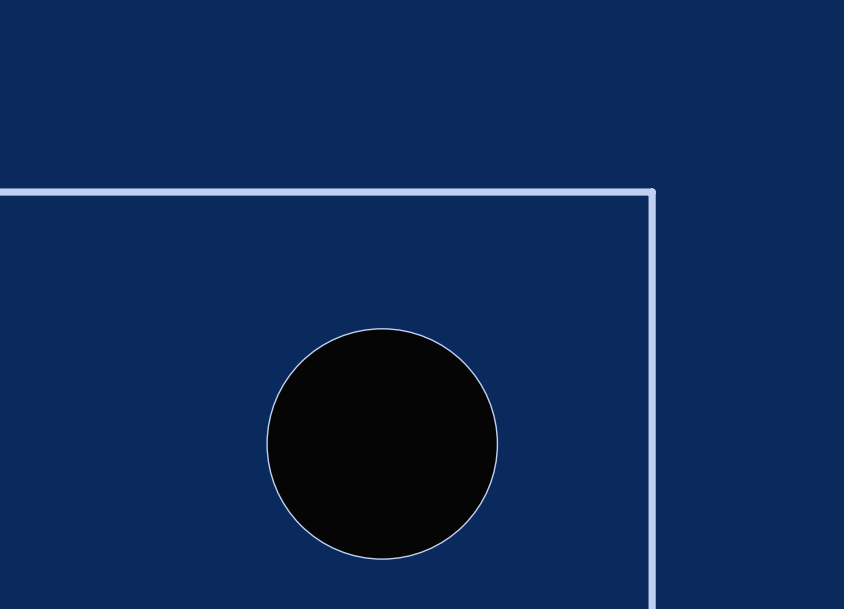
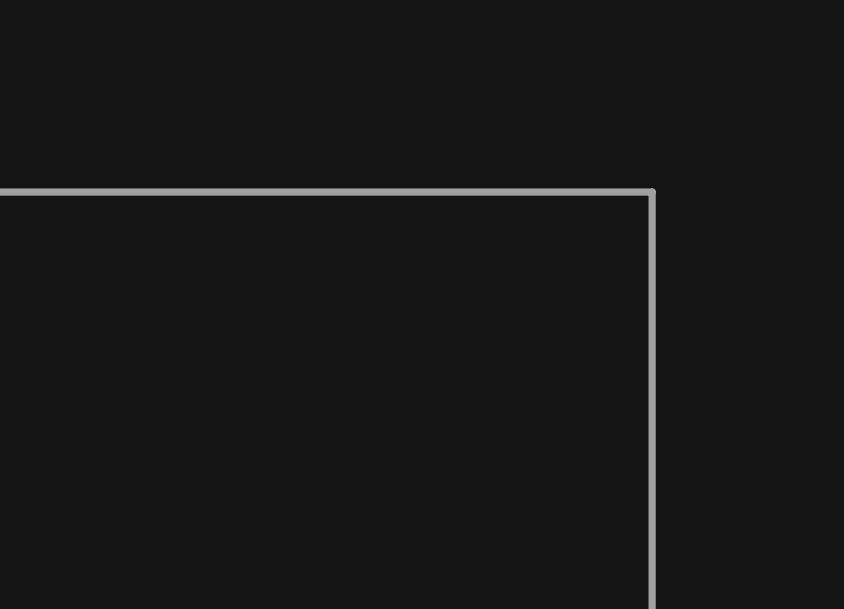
part: (382, 443) -> none

